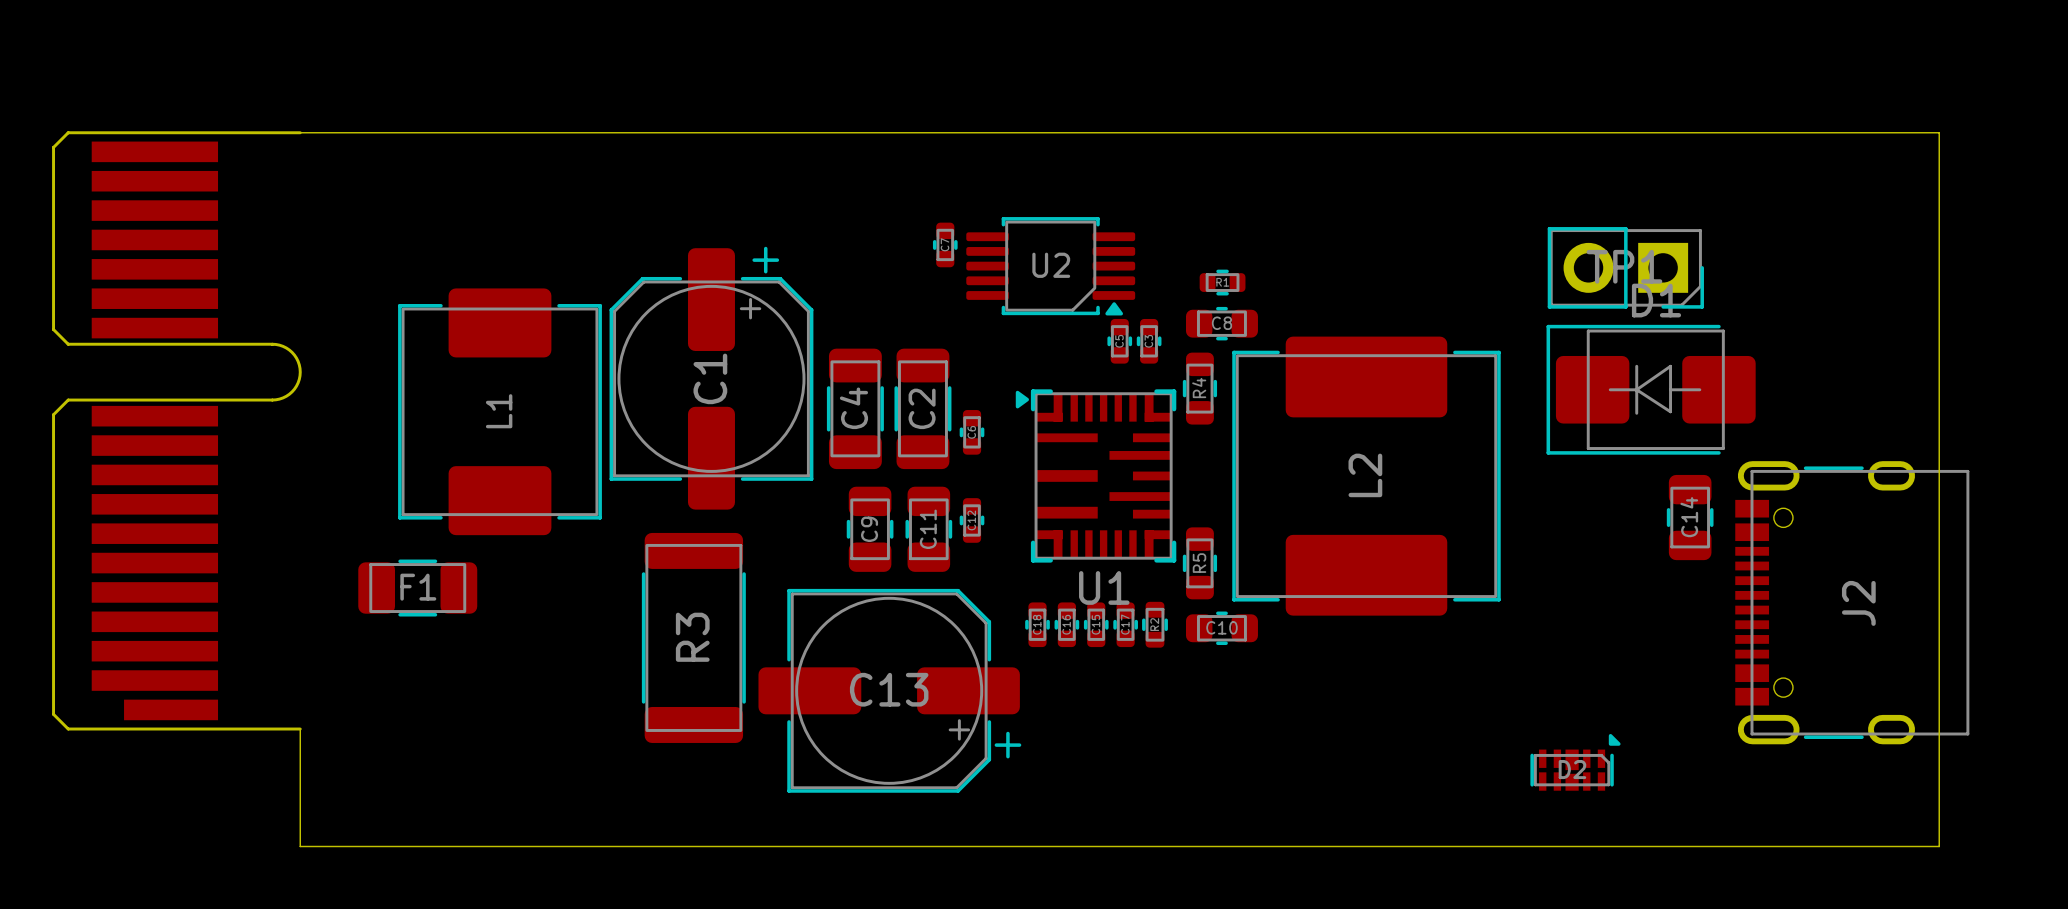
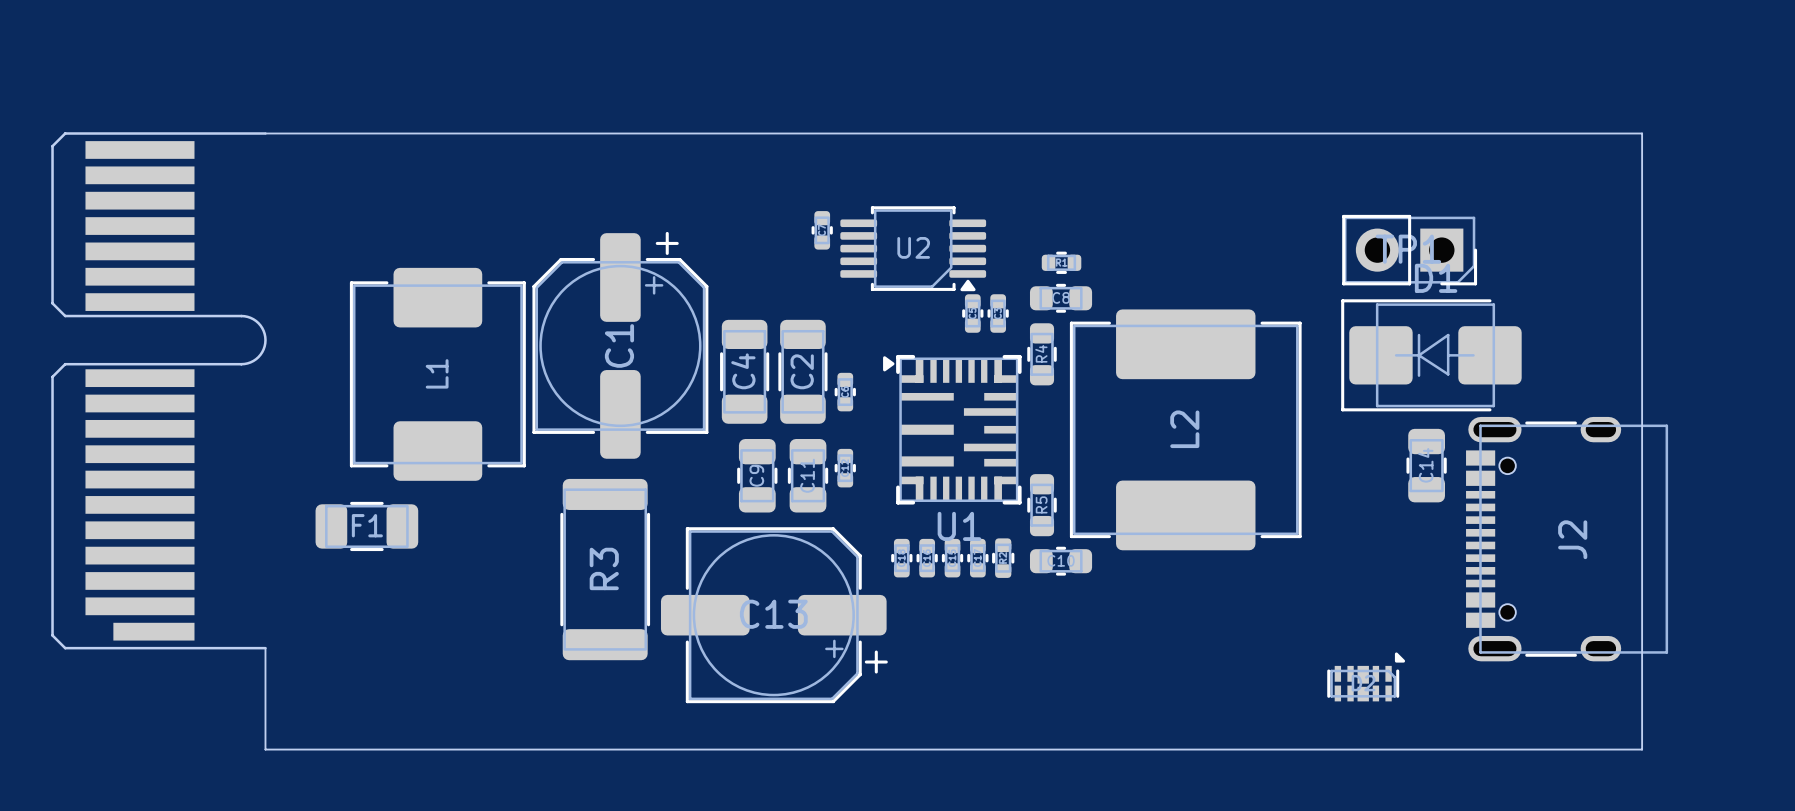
board edge: (1895, 132) (1939, 132) (1939, 846) (1895, 846) -> (1642, 133) (1642, 749)
C14 position: (1690, 517) -> (1426, 465)
J2 position: (1852, 602) -> (1567, 539)

